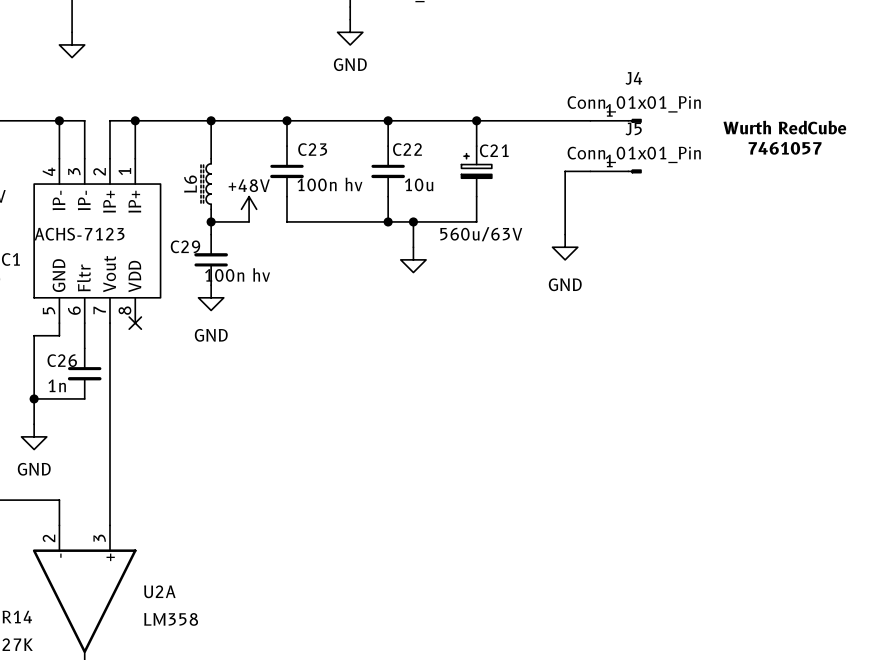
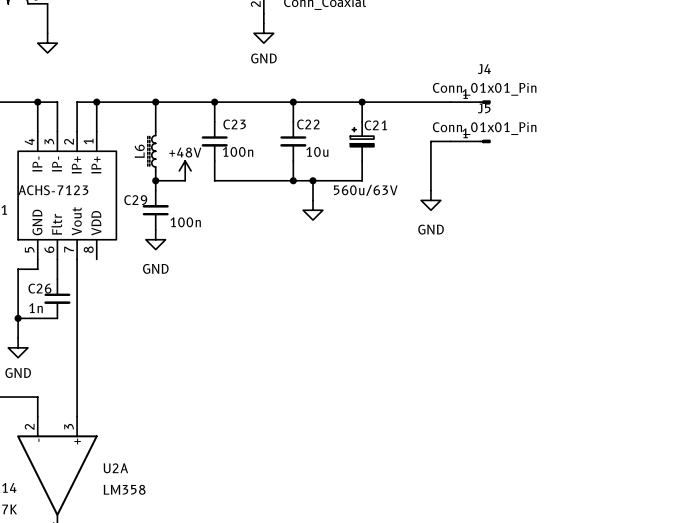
text: Wurth RedCube (784, 127) -> none
text: 7461057 (785, 148) -> none
C23 value: 100n hv (329, 184) -> 100n (238, 151)
C29 value: 100n hv (237, 275) -> 100n (185, 222)
no-connect mark: (135, 323) -> none

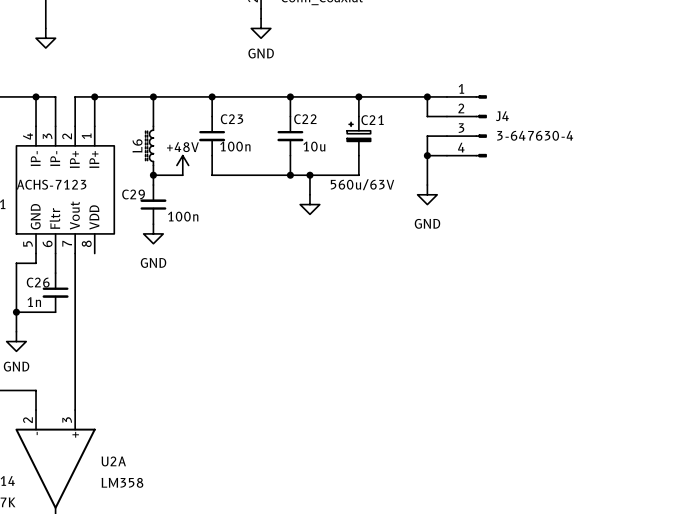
J4 name position: J4 (484, 69) -> J4 (502, 116)
J4 value: Conn_01x01_Pin (484, 89) -> 3-647630-4 (535, 135)
J4 symbol: [450, 100, 491, 104] -> [446, 95, 487, 158]
wire: none -> (427, 96) (427, 116) (446, 116)
junction: none -> (427, 96)
J5: Conn_01x01_Pin (470, 141) -> none
wire: none -> (427, 155) (446, 155)
junction: none -> (427, 155)

